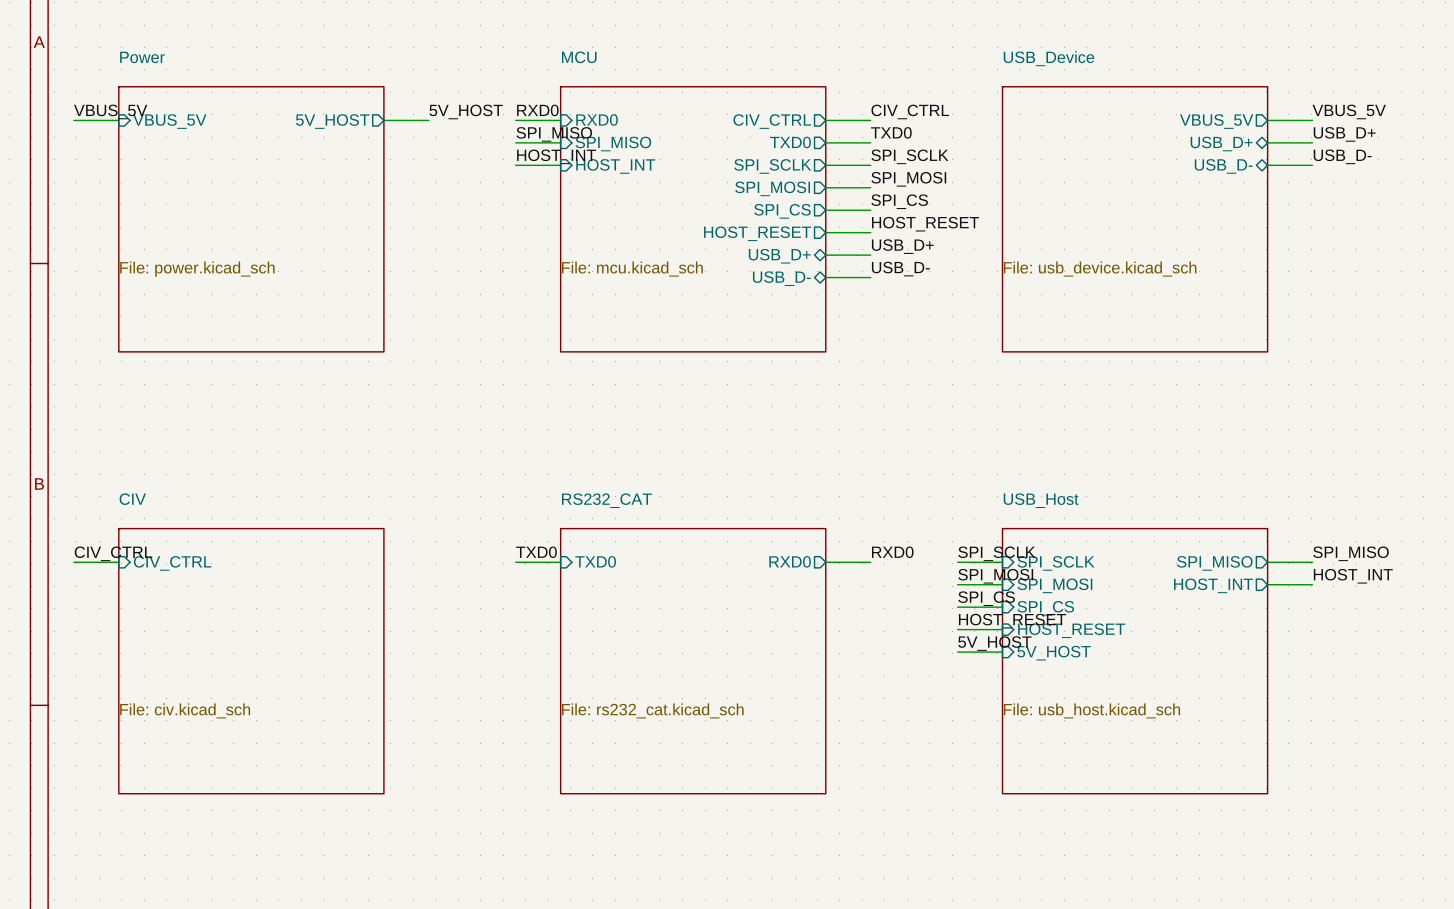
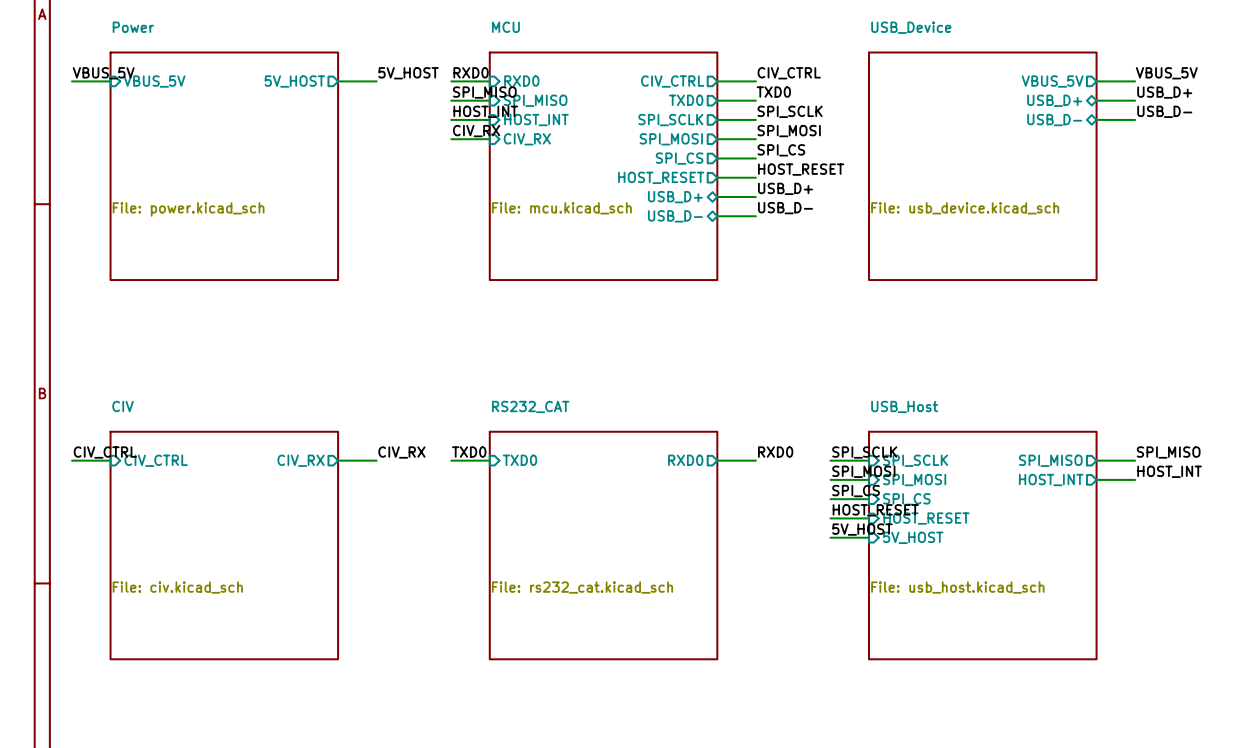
label: none -> CIV_RX (476, 131)
wire: none -> (451, 139) (489, 139)
sheet pin: none -> CIV_RX (527, 139)
label: none -> CIV_RX (401, 452)
wire: none -> (338, 460) (376, 460)
sheet pin: none -> CIV_RX (301, 460)

